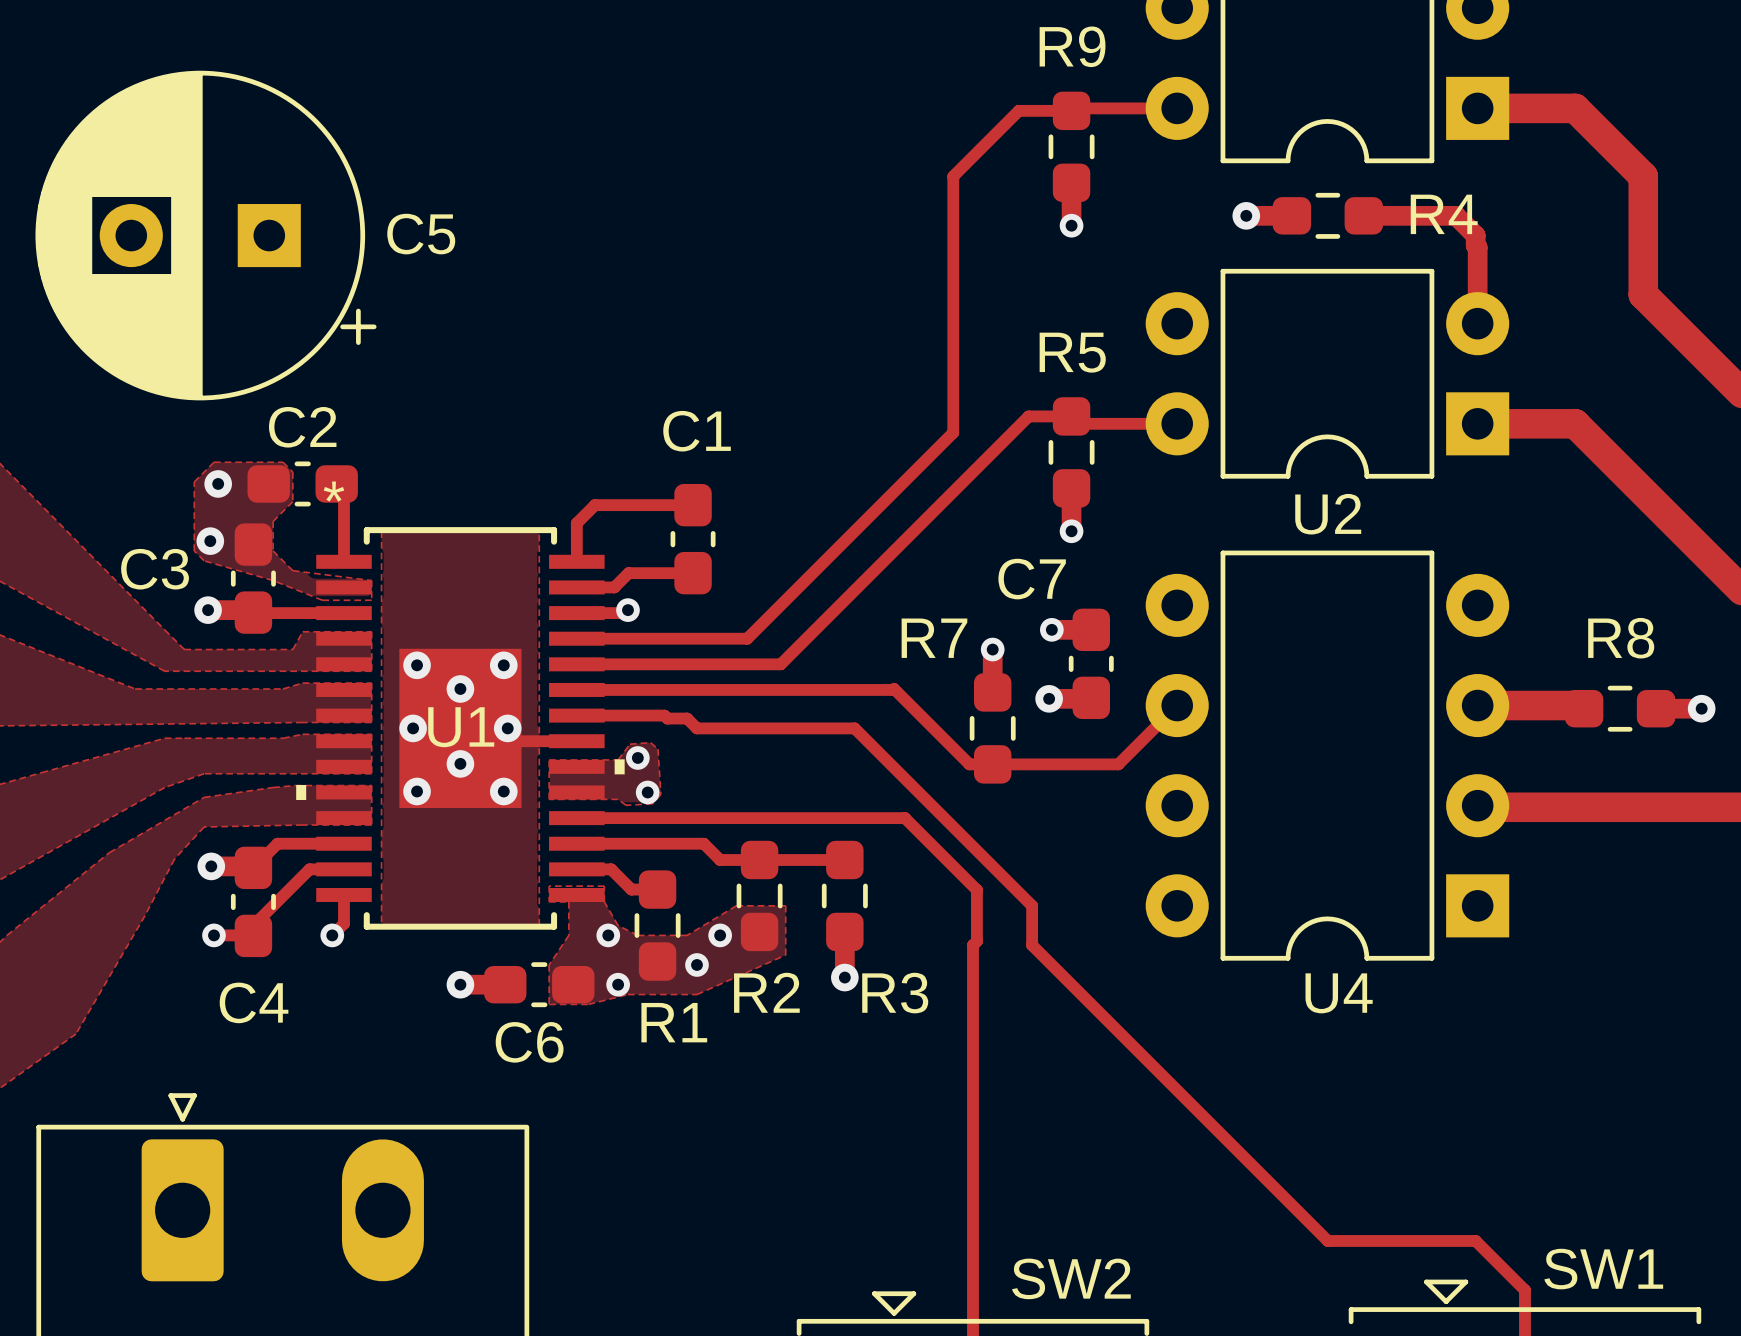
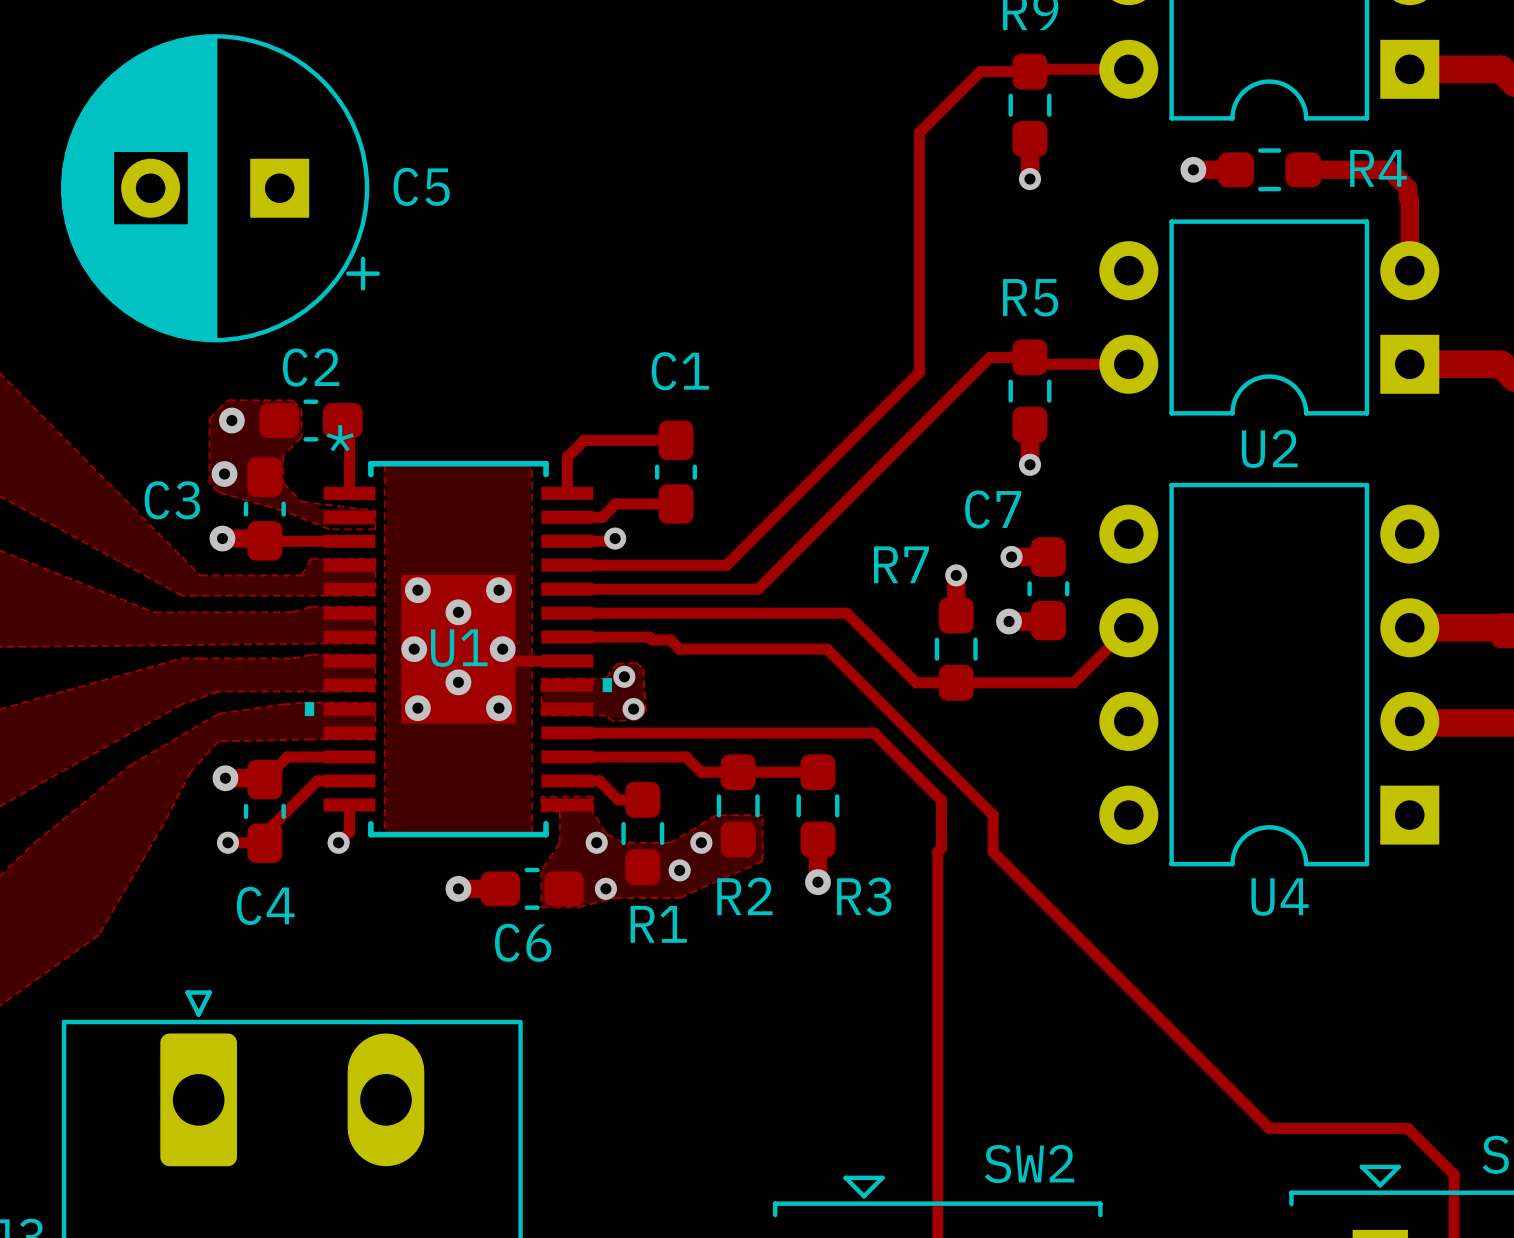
track: (875, 689) (894, 688) (969, 764) -> (846, 613) (916, 682) (934, 682)

